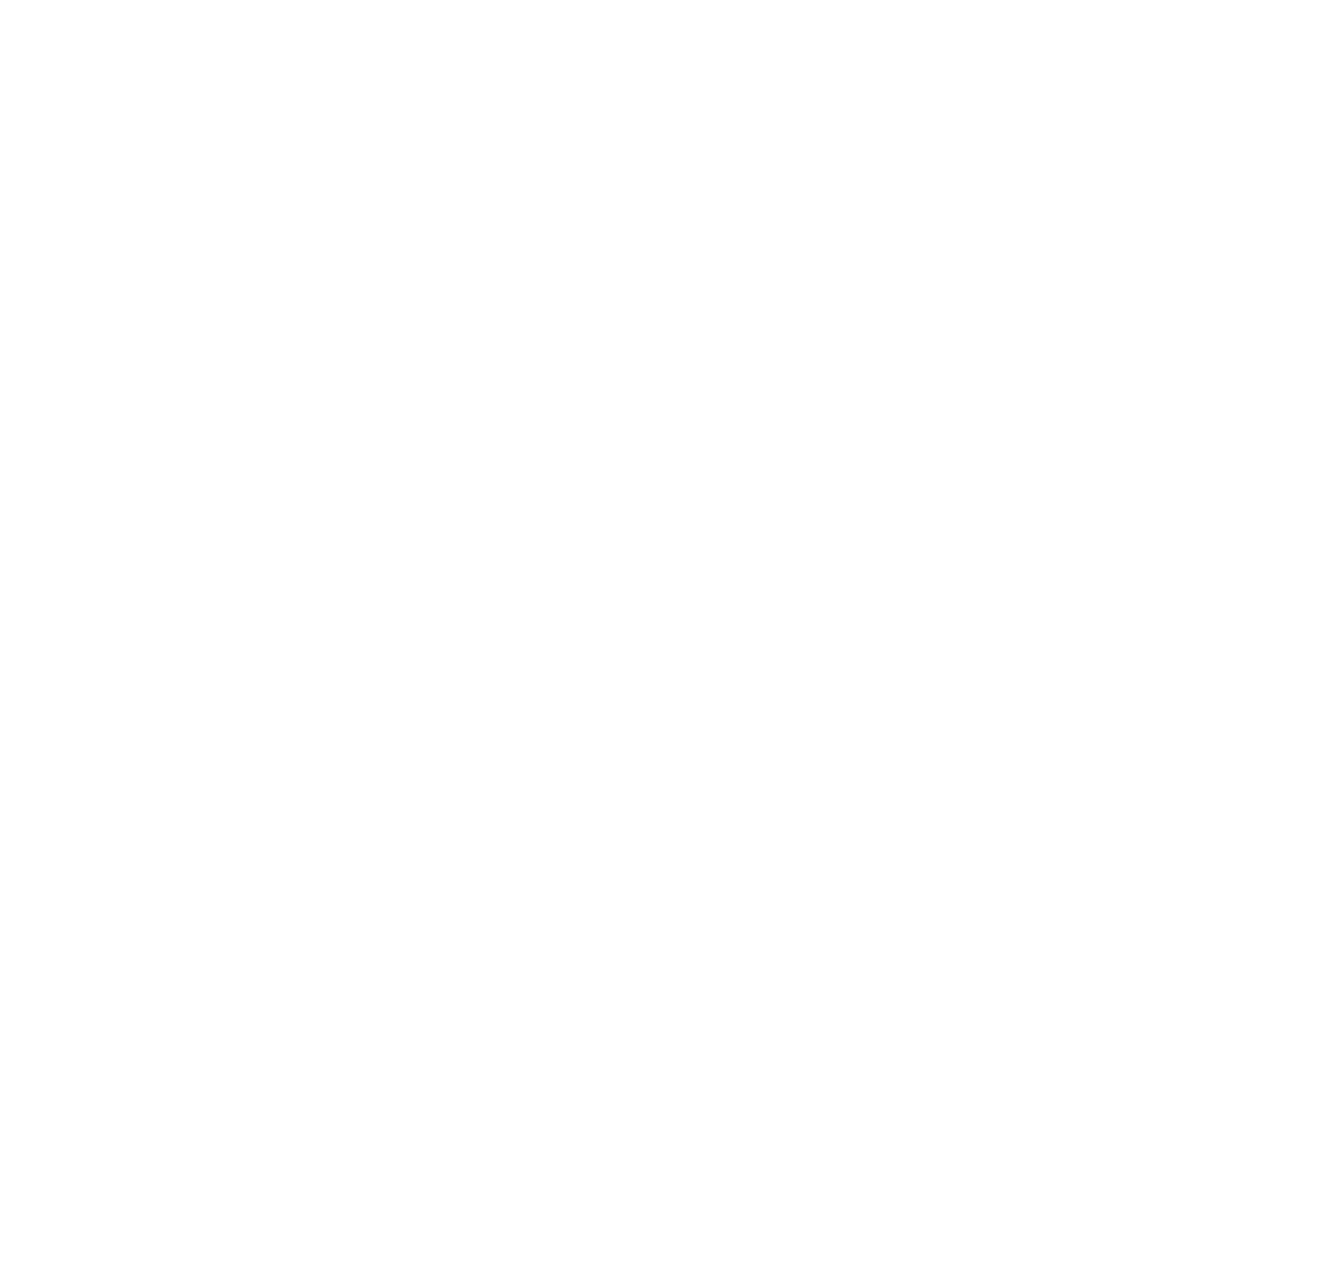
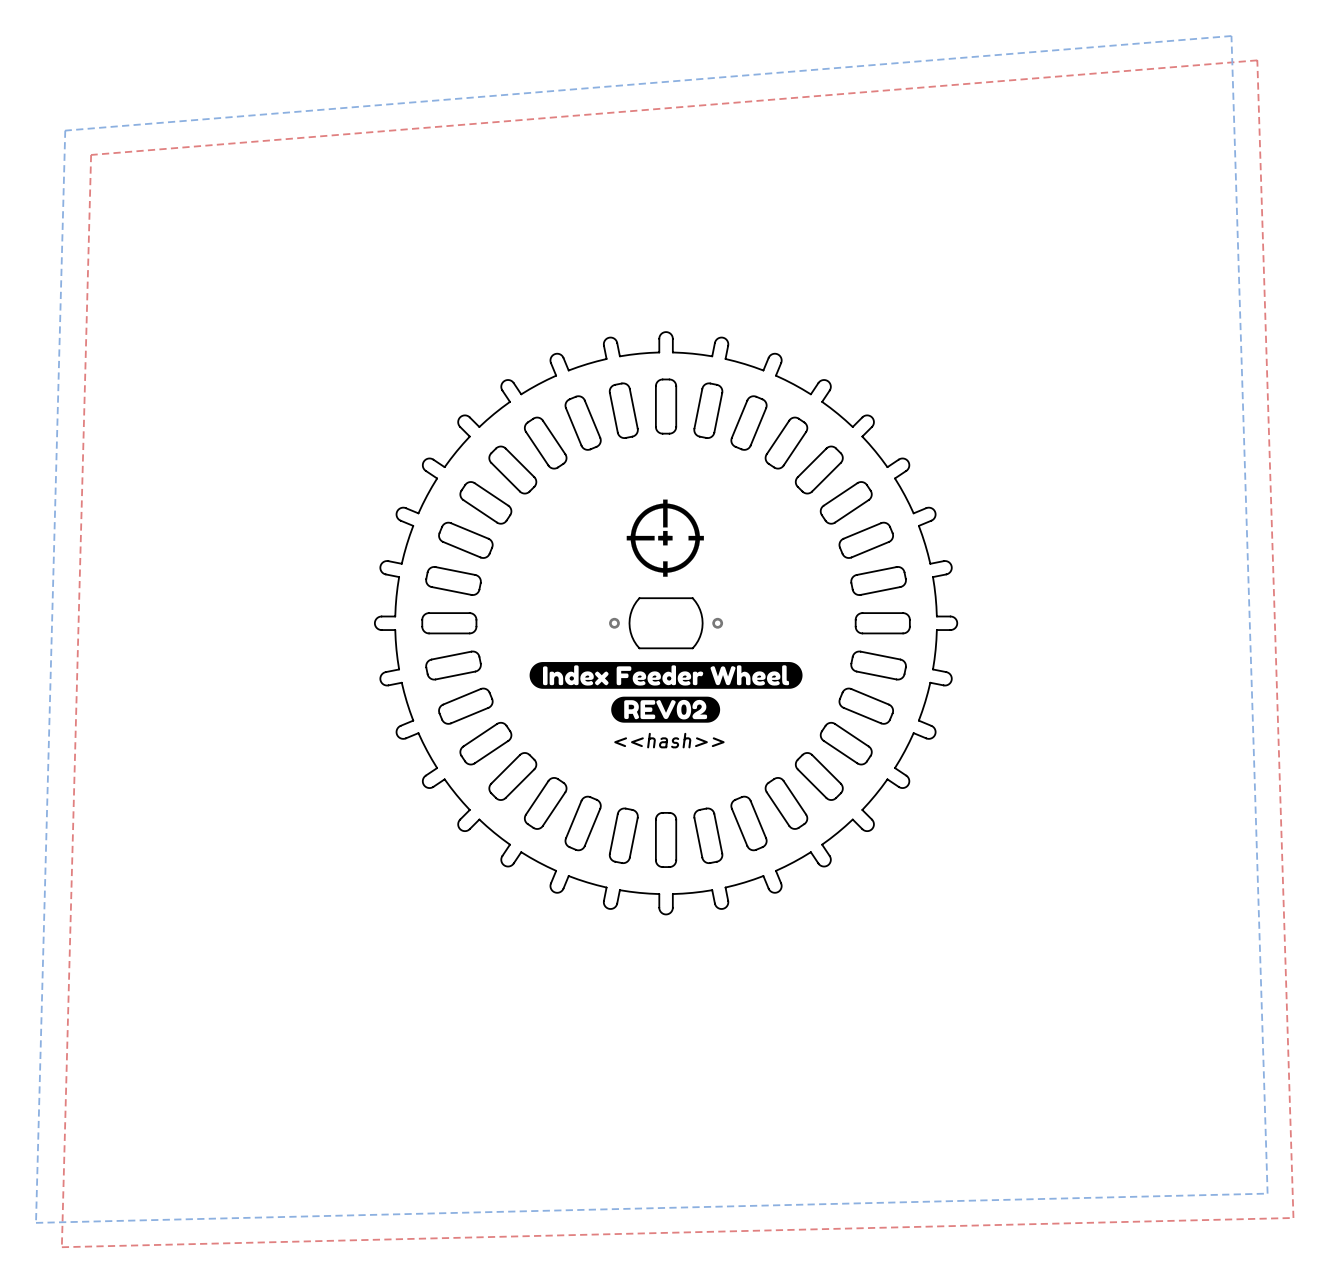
bottom zone outline: none -> (1231, 36) (1267, 1193) (36, 1222) (65, 130) (1231, 36)
top zone outline: none -> (1257, 60) (1293, 1217) (61, 1247) (91, 154) (1257, 60)
board edge: none -> (672, 338) (672, 352) (712, 356) (715, 340) (723, 337) (728, 343) (725, 358) (763, 370) (769, 356) (777, 354) (781, 361) (775, 375) (810, 394) (819, 381) (827, 381) (830, 388) (822, 401) (852, 427) (863, 416) (871, 417) (873, 425) (862, 436) (887, 467) (900, 458) (908, 461) (907, 469) (894, 478) (913, 513) (927, 507) (935, 511) (932, 519) (918, 525) (930, 563) (945, 561) (951, 566) (948, 573) (932, 577) (936, 616) (952, 616) (957, 623) (952, 629) (936, 630) (932, 669) (948, 672) (951, 680) (945, 685) (930, 682) (918, 720) (932, 726) (935, 734) (927, 738) (913, 733) (894, 768) (907, 776) (908, 785) (900, 787) (887, 779) (862, 809) (873, 821) (871, 829) (863, 830) (852, 819) (822, 844) (830, 857) (827, 865) (819, 864) (810, 852) (775, 870) (781, 885) (777, 892) (769, 890) (763, 876) (725, 887) (728, 902) (722, 908) (715, 905) (712, 890) (672, 894) (672, 909) (666, 914) (659, 909) (659, 894) (619, 890) (616, 905) (609, 908) (603, 902) (606, 887) (568, 876) (562, 890) (554, 892) (550, 885) (556, 870) (521, 852) (512, 864) (504, 865) (501, 857) (509, 844) (479, 819) (468, 830) (460, 829) (459, 820) (469, 809) (444, 779) (431, 787) (423, 785) (424, 776) (437, 768) (418, 733) (404, 738) (397, 734) (399, 726) (413, 720) (401, 682) (386, 685) (380, 680) (384, 672) (399, 669) (395, 630) (379, 629) (374, 623) (379, 616) (395, 616) (399, 577) (384, 573) (380, 566) (386, 561) (401, 563) (413, 525) (399, 519) (397, 511) (404, 507) (418, 513) (437, 478) (424, 469) (423, 461) (431, 458) (444, 467) (469, 436) (459, 425) (460, 417) (468, 416) (479, 427) (509, 401) (501, 388) (504, 381) (512, 381) (521, 394) (556, 375) (550, 361) (554, 354) (562, 356) (568, 370) (606, 358) (603, 343) (608, 337) (616, 340) (619, 356) (659, 352) (659, 337) (664, 332) (670, 333) (672, 338)
board edge: none -> (669, 379) (660, 379) (655, 385) (655, 427) (661, 433) (672, 433) (676, 427) (676, 385) (674, 381) (669, 379)
board edge: none -> (710, 383) (719, 385) (722, 391) (714, 433) (707, 438) (697, 435) (694, 429) (702, 387) (705, 384) (710, 383)
board edge: none -> (575, 396) (567, 400) (565, 407) (581, 446) (589, 449) (598, 445) (600, 438) (584, 399) (580, 396) (575, 396)
board edge: none -> (756, 396) (764, 400) (766, 407) (750, 446) (742, 449) (733, 445) (731, 438) (747, 399) (751, 396) (756, 396)
board edge: none -> (533, 418) (525, 424) (525, 431) (548, 466) (557, 467) (565, 461) (565, 455) (542, 419) (538, 417) (533, 418)
board edge: none -> (798, 418) (806, 424) (806, 431) (783, 466) (775, 467) (766, 462) (766, 454) (789, 419) (794, 417) (798, 418)
board edge: none -> (617, 432) (620, 436) (625, 438) (634, 435) (637, 430) (629, 387) (623, 383) (613, 385) (609, 391) (617, 432)
board edge: none -> (836, 448) (832, 446) (827, 447) (797, 477) (796, 484) (803, 492) (811, 492) (841, 462) (842, 455) (836, 448)
board edge: none -> (491, 453) (498, 447) (504, 447) (534, 477) (534, 486) (527, 492) (520, 492) (490, 462) (489, 457) (491, 453)
board edge: none -> (474, 483) (509, 506) (511, 513) (504, 522) (497, 522) (462, 498) (460, 493) (465, 484) (469, 482) (474, 483)
board edge: none -> (857, 483) (822, 507) (820, 513) (826, 522) (834, 523) (870, 498) (871, 493) (866, 484) (862, 482) (857, 483)
drawing: none -> [626, 499, 704, 577]
board edge: none -> (450, 523) (490, 539) (492, 545) (488, 555) (481, 557) (441, 541) (439, 535) (442, 526) (445, 523) (450, 523)
board edge: none -> (881, 523) (841, 539) (839, 545) (843, 555) (850, 557) (890, 541) (893, 535) (889, 526) (885, 522) (881, 523)
board edge: none -> (435, 567) (477, 575) (480, 581) (478, 591) (472, 595) (429, 586) (426, 581) (427, 571) (431, 567) (435, 567)
board edge: none -> (856, 574) (852, 577) (851, 582) (853, 592) (858, 595) (901, 586) (905, 580) (903, 570) (898, 566) (856, 574)
board edge: none -> (692, 598) (639, 598) (632, 609) (629, 623) (632, 636) (639, 648) (692, 648) (700, 636) (702, 623) (700, 609) (692, 598)
board edge: none -> (469, 613) (427, 613) (422, 618) (422, 628) (428, 633) (471, 633) (476, 628) (476, 618) (473, 614) (469, 613)
board edge: none -> (903, 613) (860, 613) (856, 617) (855, 628) (861, 633) (904, 633) (909, 629) (909, 618) (907, 614) (903, 613)
via: none -> (614, 623)
via: none -> (717, 623)
board edge: none -> (860, 651) (902, 660) (905, 665) (903, 675) (897, 679) (855, 670) (851, 666) (852, 656) (855, 652) (860, 651)
drawing: none -> [529, 662, 803, 723]
board edge: none -> (475, 671) (433, 679) (428, 675) (426, 665) (430, 659) (473, 651) (478, 654) (480, 664) (479, 669) (475, 671)
board edge: none -> (480, 689) (441, 705) (439, 711) (443, 721) (450, 723) (490, 706) (492, 701) (489, 691) (485, 688) (480, 689)
board edge: none -> (851, 689) (888, 704) (890, 705) (893, 711) (889, 721) (882, 723) (842, 706) (839, 701) (842, 692) (846, 689) (849, 688) (850, 688) (851, 689)
board edge: none -> (497, 723) (462, 747) (460, 754) (466, 762) (473, 763) (510, 739) (511, 733) (505, 725) (502, 722) (497, 723)
board edge: none -> (835, 723) (868, 746) (870, 747) (871, 754) (865, 762) (858, 763) (822, 739) (820, 733) (826, 725) (830, 722) (832, 723) (834, 723) (835, 723)
text: none -> <<hash>> (669, 740)
board edge: none -> (557, 779) (565, 784) (565, 791) (542, 826) (534, 828) (525, 822) (525, 815) (549, 780) (552, 778) (557, 779)
board edge: none -> (774, 779) (766, 784) (766, 791) (789, 826) (797, 828) (806, 822) (806, 815) (783, 780) (779, 778) (774, 779)
board edge: none -> (840, 793) (842, 789) (841, 784) (811, 754) (804, 753) (797, 760) (797, 768) (827, 798) (833, 799) (840, 793)
board edge: none -> (590, 797) (599, 801) (600, 807) (584, 846) (576, 850) (567, 845) (565, 839) (581, 800) (585, 797) (590, 797)
board edge: none -> (741, 797) (733, 801) (731, 807) (747, 846) (755, 850) (764, 845) (766, 839) (750, 800) (746, 796) (741, 797)
board edge: none -> (496, 798) (489, 791) (490, 784) (520, 754) (528, 754) (535, 761) (534, 768) (504, 798) (499, 799) (496, 798)
board edge: none -> (625, 808) (635, 811) (637, 817) (629, 858) (622, 863) (612, 860) (609, 854) (618, 813) (620, 809) (625, 808)
board edge: none -> (669, 812) (660, 813) (655, 818) (655, 861) (661, 867) (672, 866) (676, 861) (676, 818) (674, 814) (669, 812)
board edge: none -> (714, 813) (722, 855) (718, 861) (708, 863) (702, 858) (694, 816) (697, 810) (707, 808) (712, 810) (714, 813)

